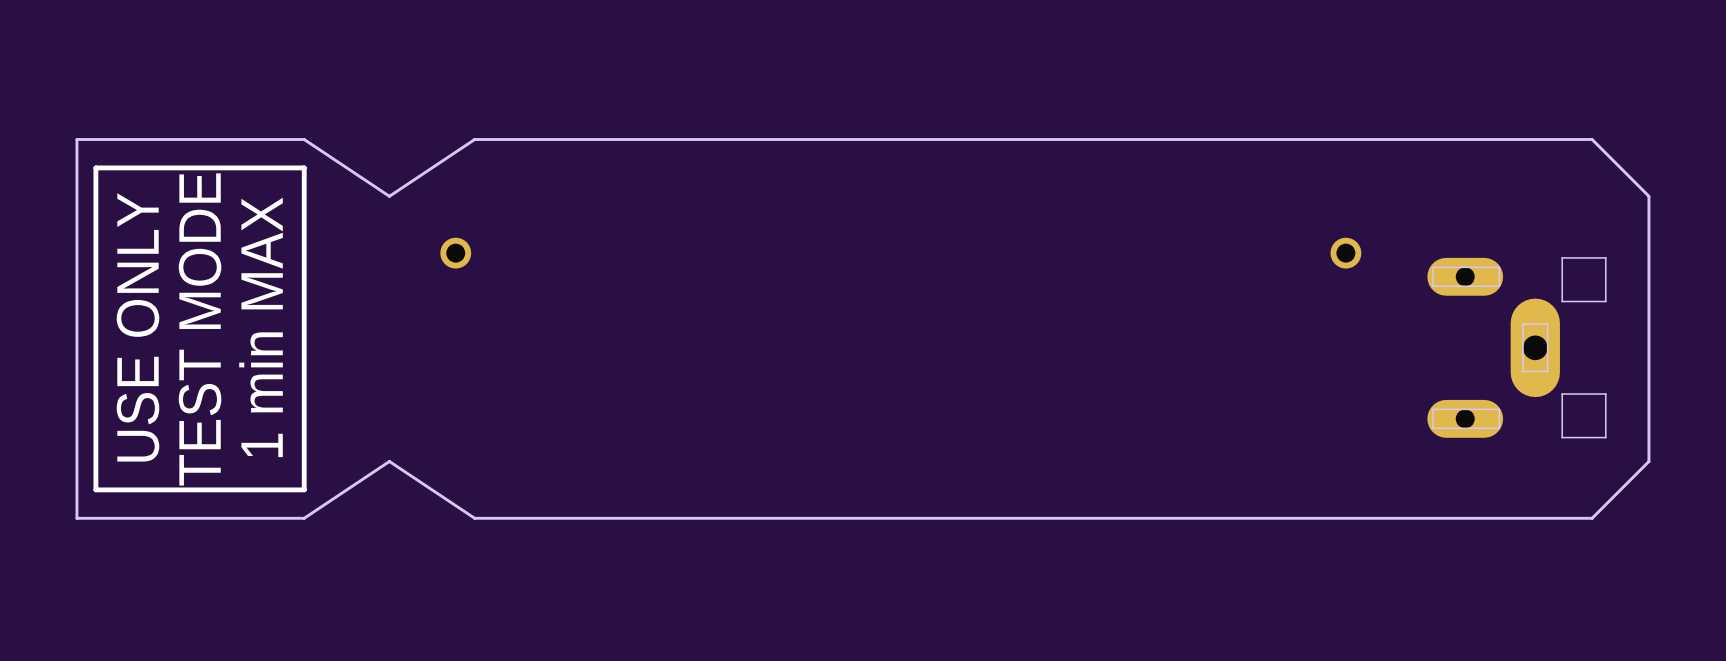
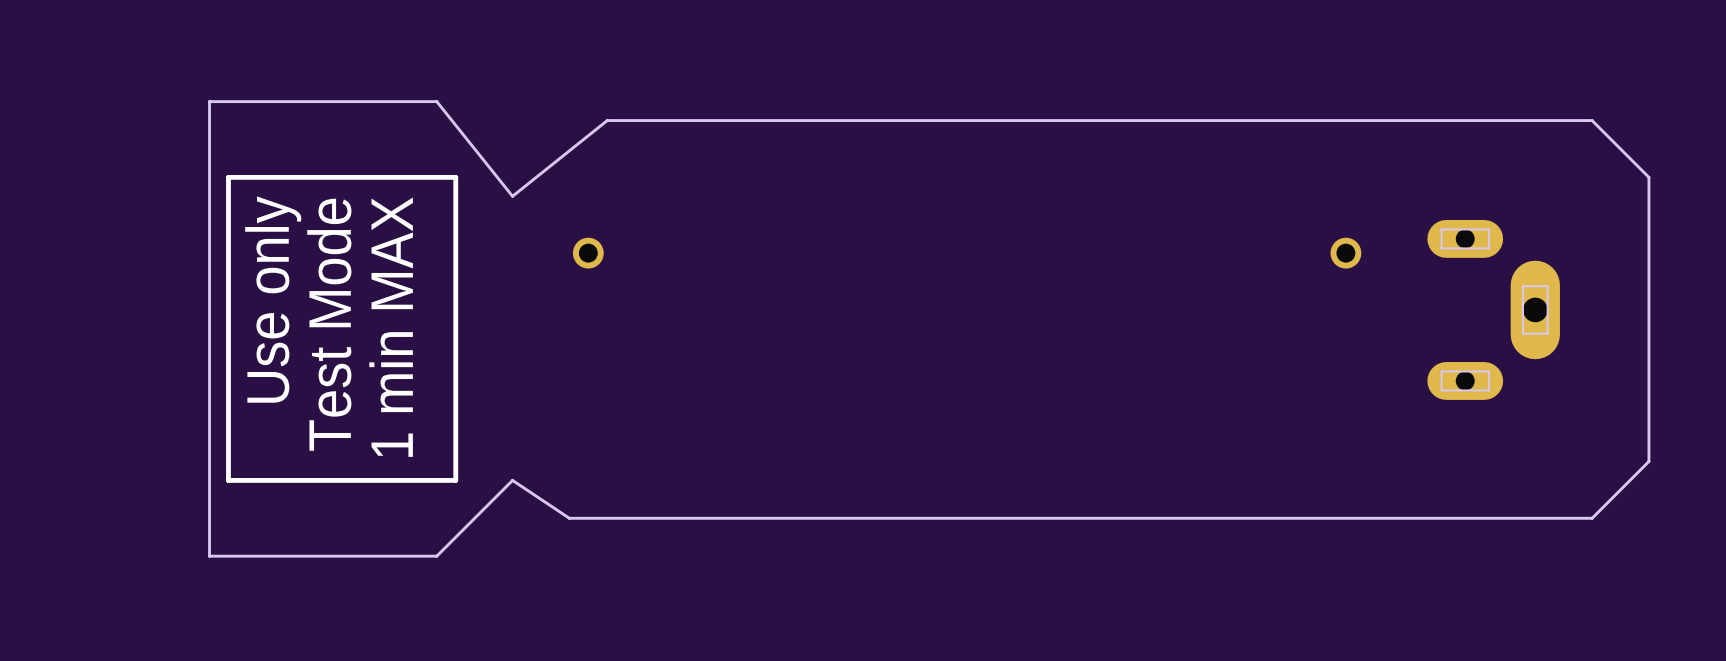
line: (304, 167) (304, 489) (95, 489) (95, 167) (304, 167) -> none
line: none -> (455, 177) (455, 480) (228, 480) (228, 177) (455, 177)
board edge: (1648, 196) (1592, 139) (474, 139) (389, 196) (304, 139) (76, 139) (76, 518) (304, 518) (389, 461) (474, 518) (569, 518) -> (1648, 196) (1648, 177) (1592, 120) (607, 120) (512, 196) (436, 101) (209, 101) (209, 556) (436, 556) (512, 480) (569, 518)
part position: (455, 253) -> (588, 253)
text: none -> Use only (273, 299)
part: none -> (1493, 309)
text: none -> Test Mode (329, 324)
text: USE ONLY (137, 327) -> none
text position: 1 min MAX (261, 327) -> 1 min MAX (391, 327)
text: TEST MODE (200, 329) -> none
part: (1516, 347) -> none

